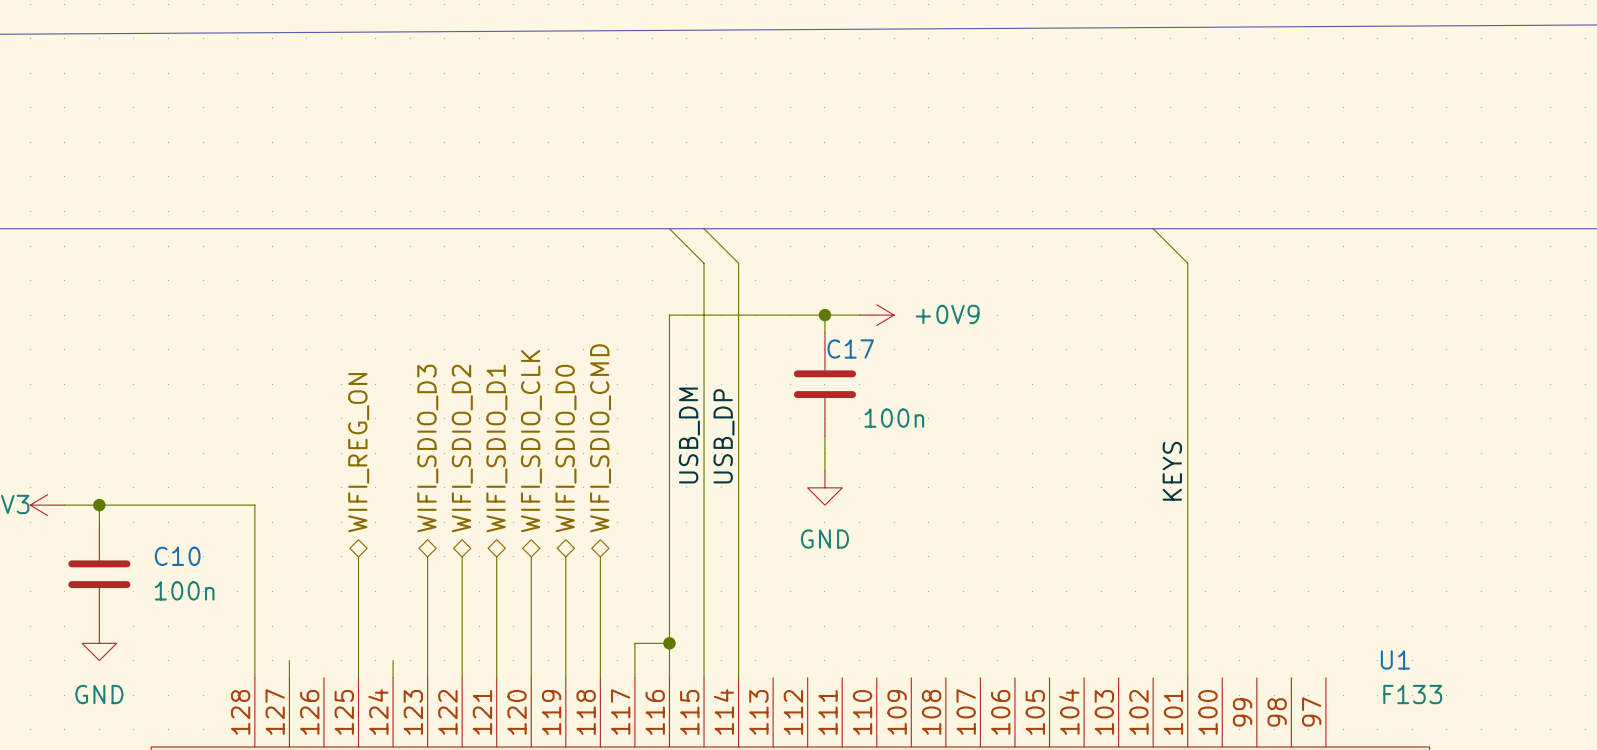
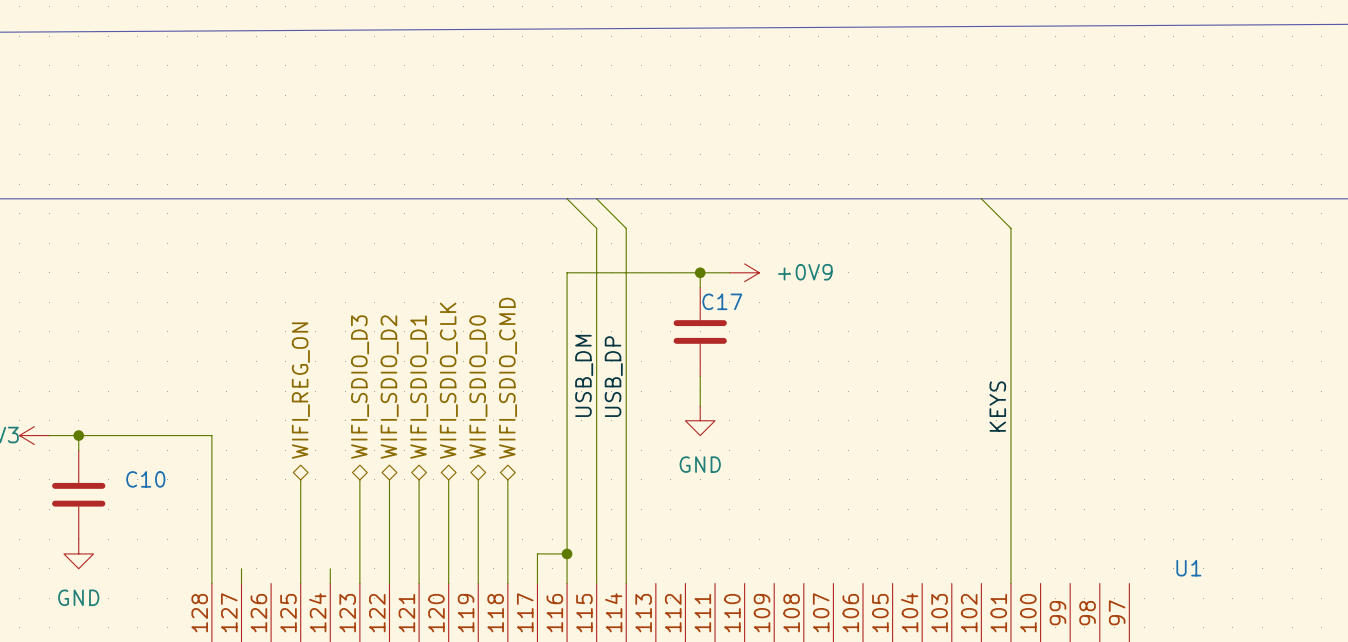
C17 value: 100n (894, 418) -> none
C10 value: 100n (184, 590) -> none
U1 value: F133 (1412, 694) -> none

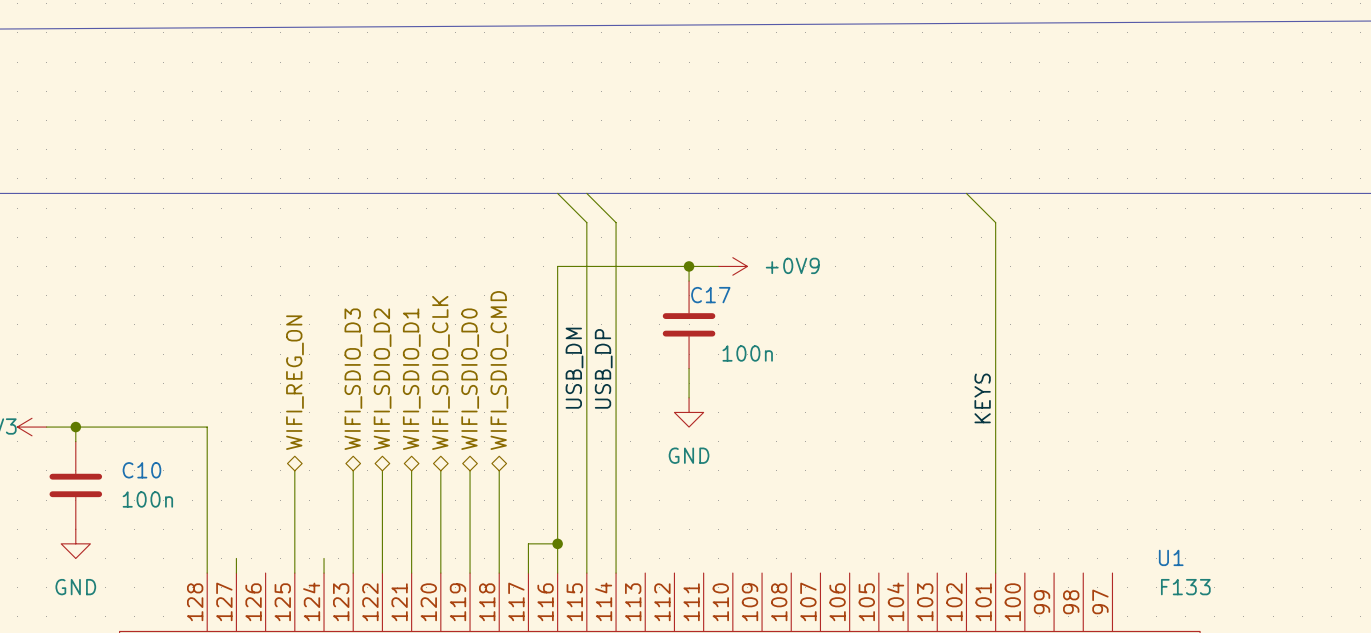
C17 value: none -> 100n (747, 353)
C10 value: none -> 100n (147, 499)
U1 value: none -> F133 (1185, 587)

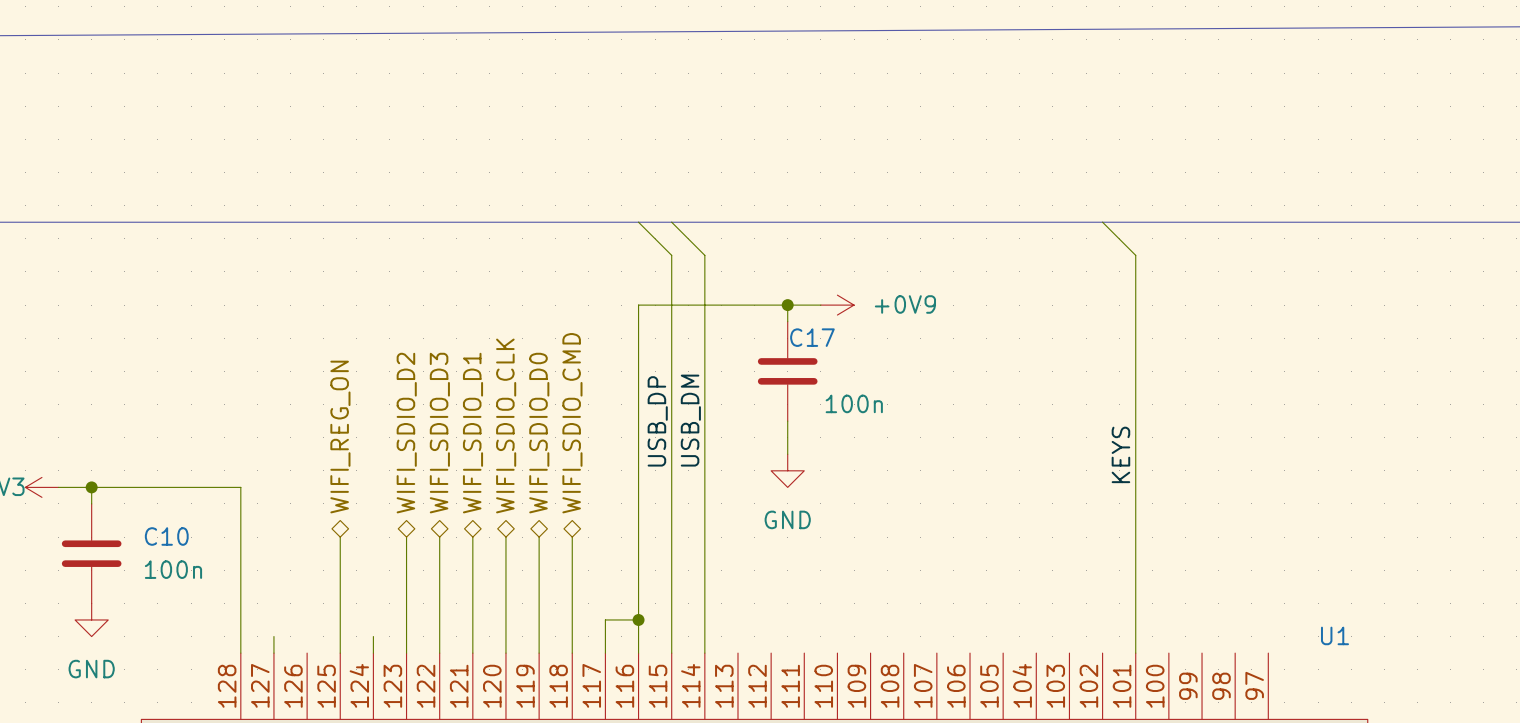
label: USB_DM (574, 368) -> USB_DP (657, 421)
label: USB_DP (603, 368) -> USB_DM (690, 420)
hierarchical label: WIFI_SDIO_D3 (353, 379) -> WIFI_SDIO_D2 (406, 433)
hierarchical label: WIFI_SDIO_D2 (382, 379) -> WIFI_SDIO_D3 (439, 433)
U1 value: F133 (1185, 587) -> none

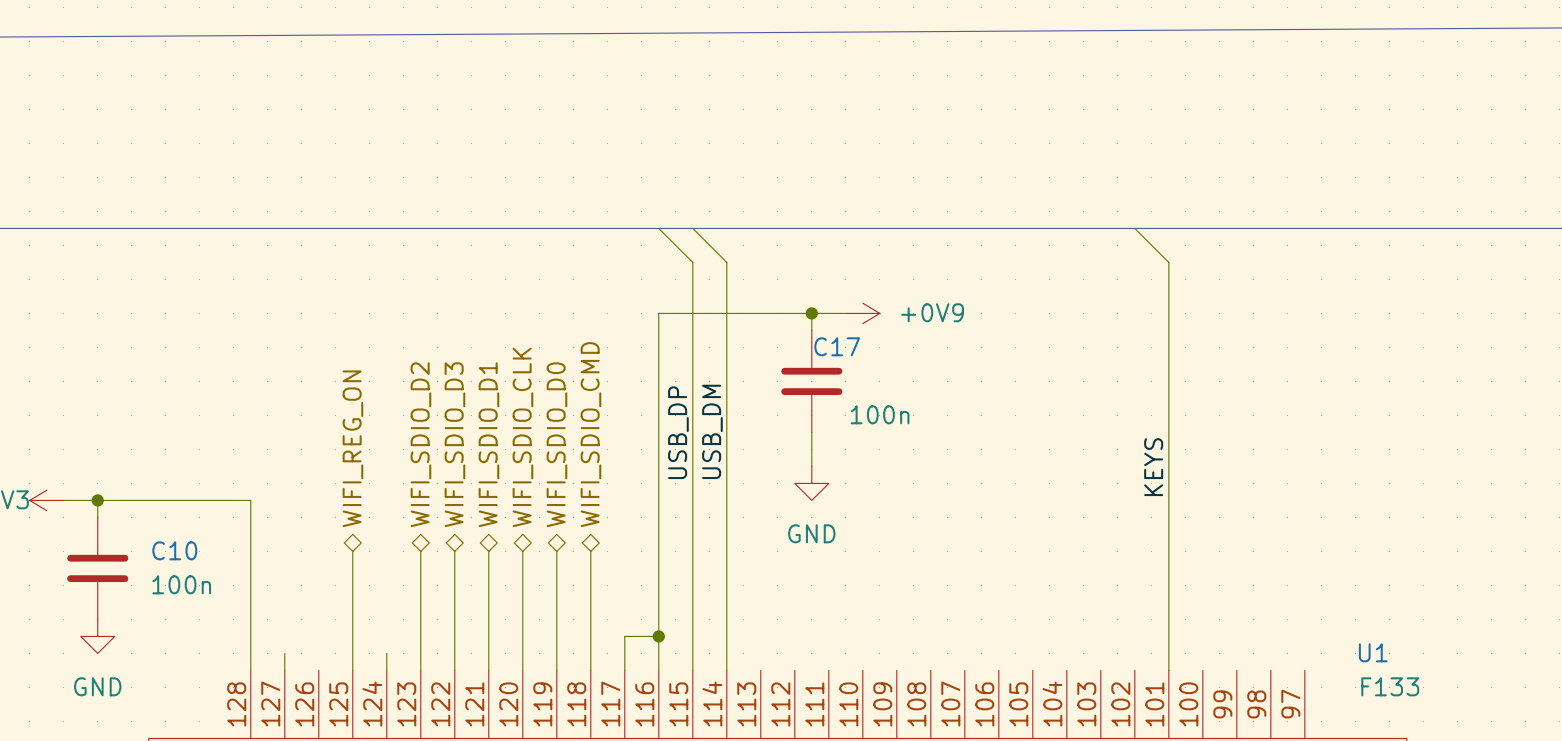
U1 value: none -> F133 (1390, 686)

